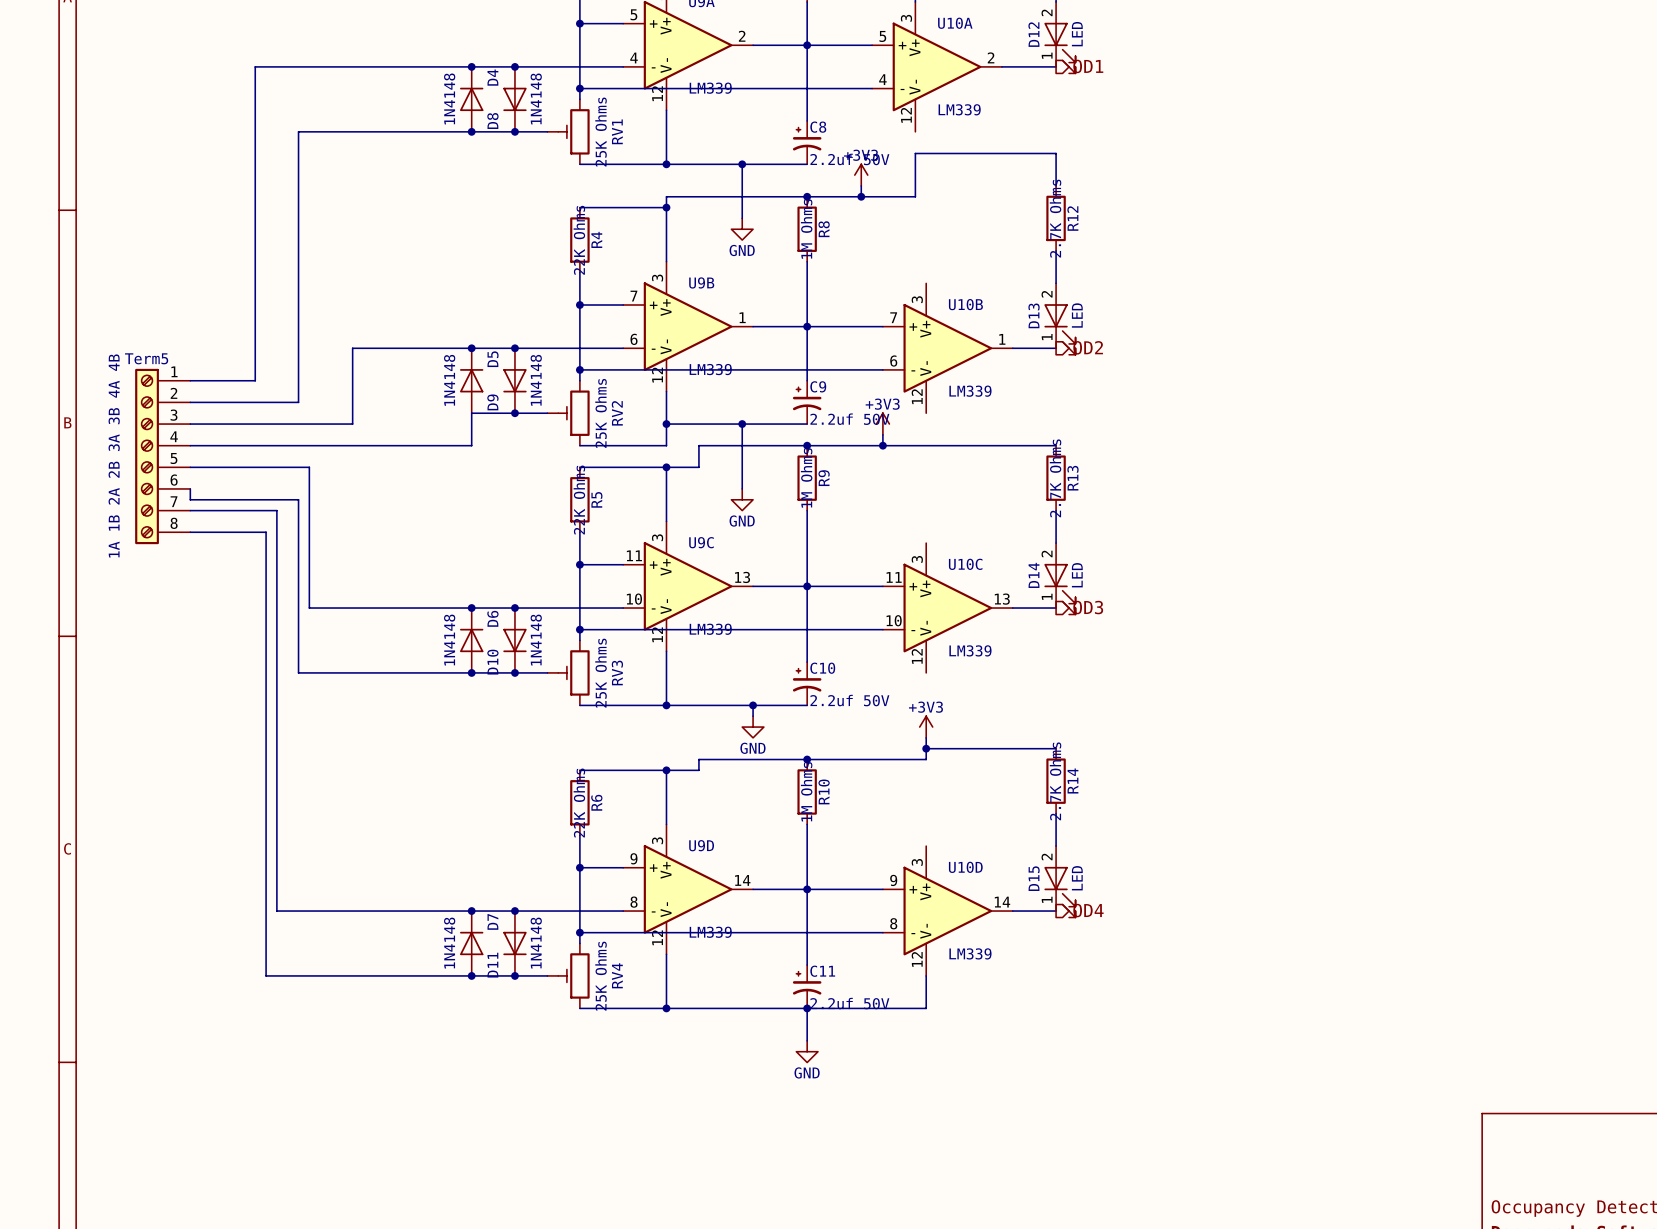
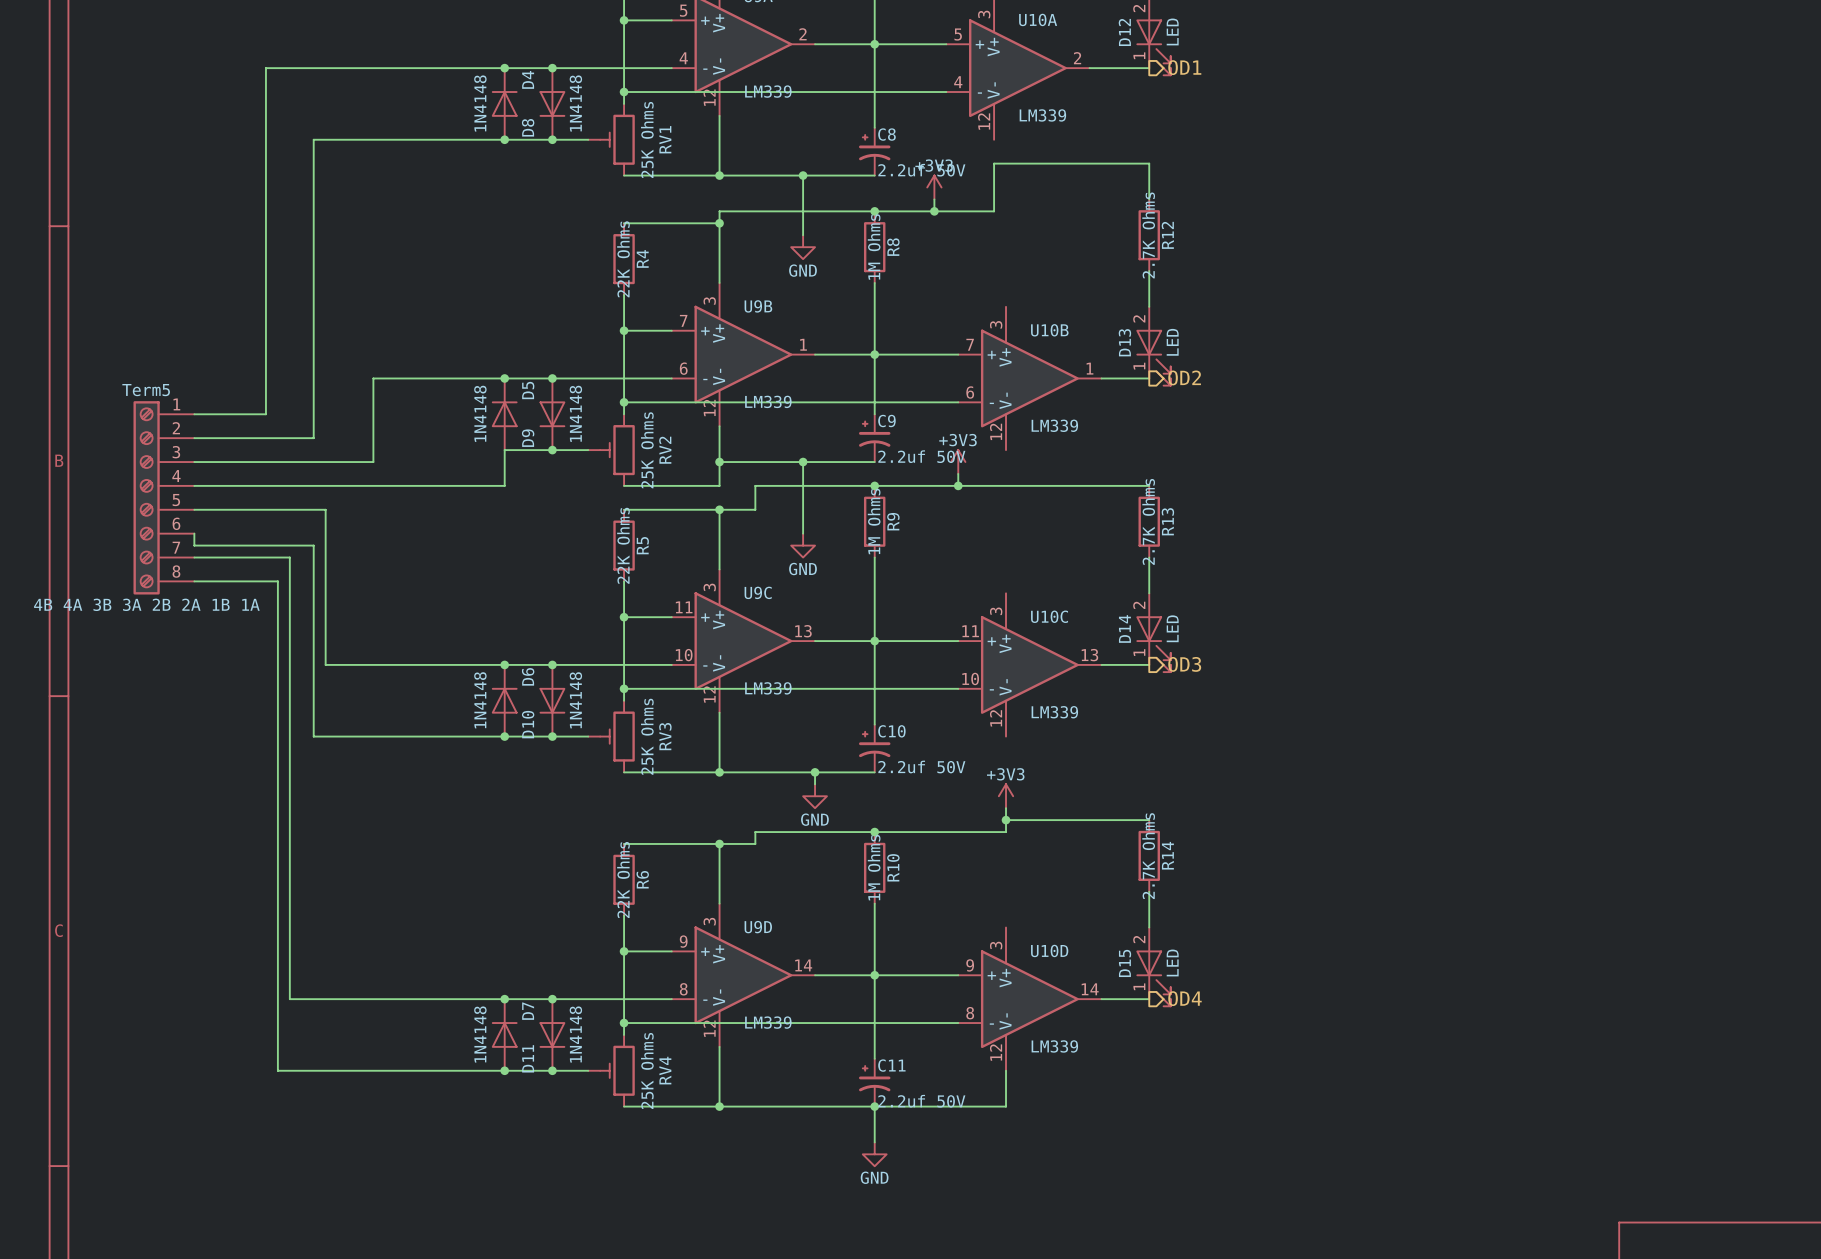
Term5 value: 1A 1B 2A 2B 3A 3B 4A 4B (114, 455) -> 4B 4A 3B 3A 2B 2A 1B 1A (146, 604)

